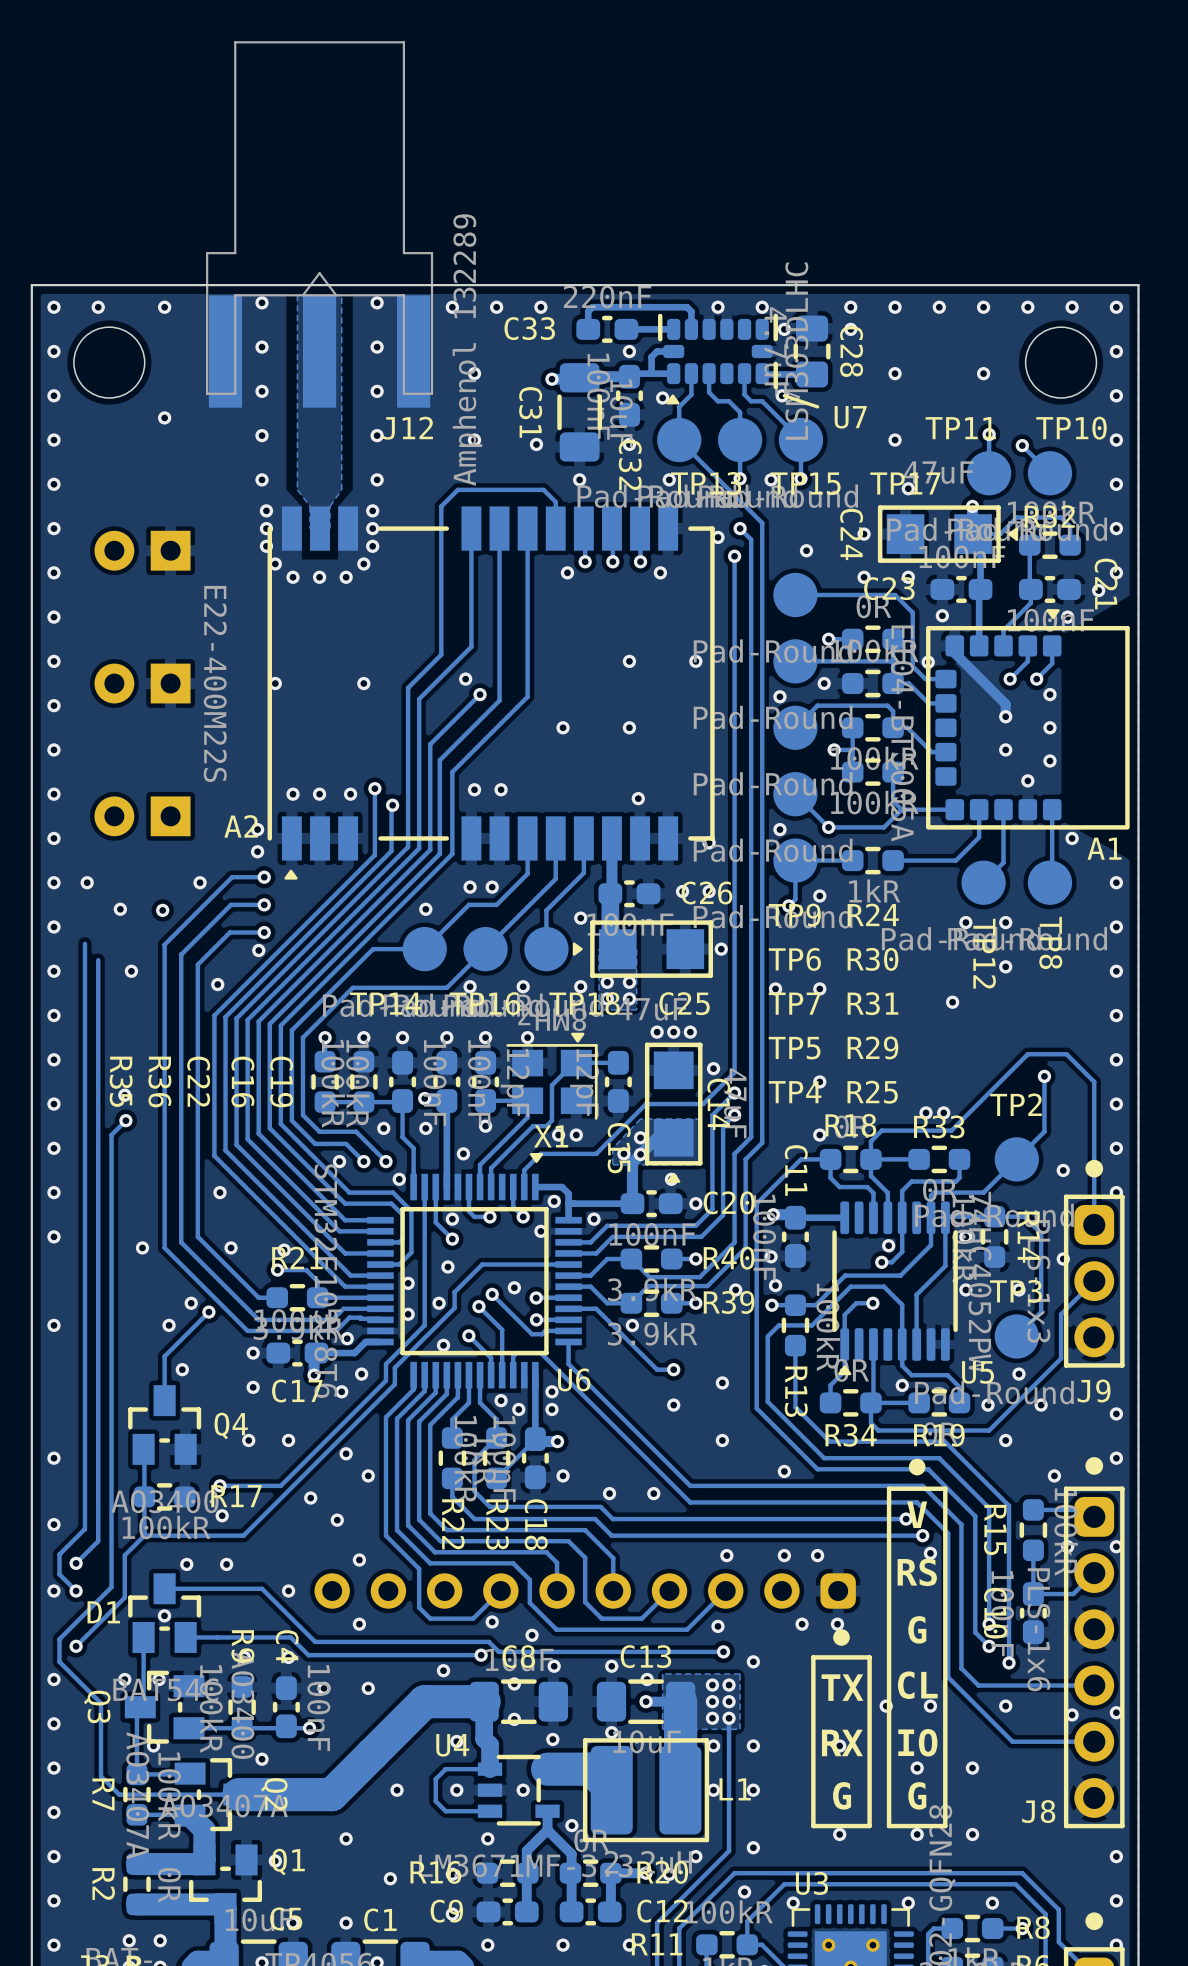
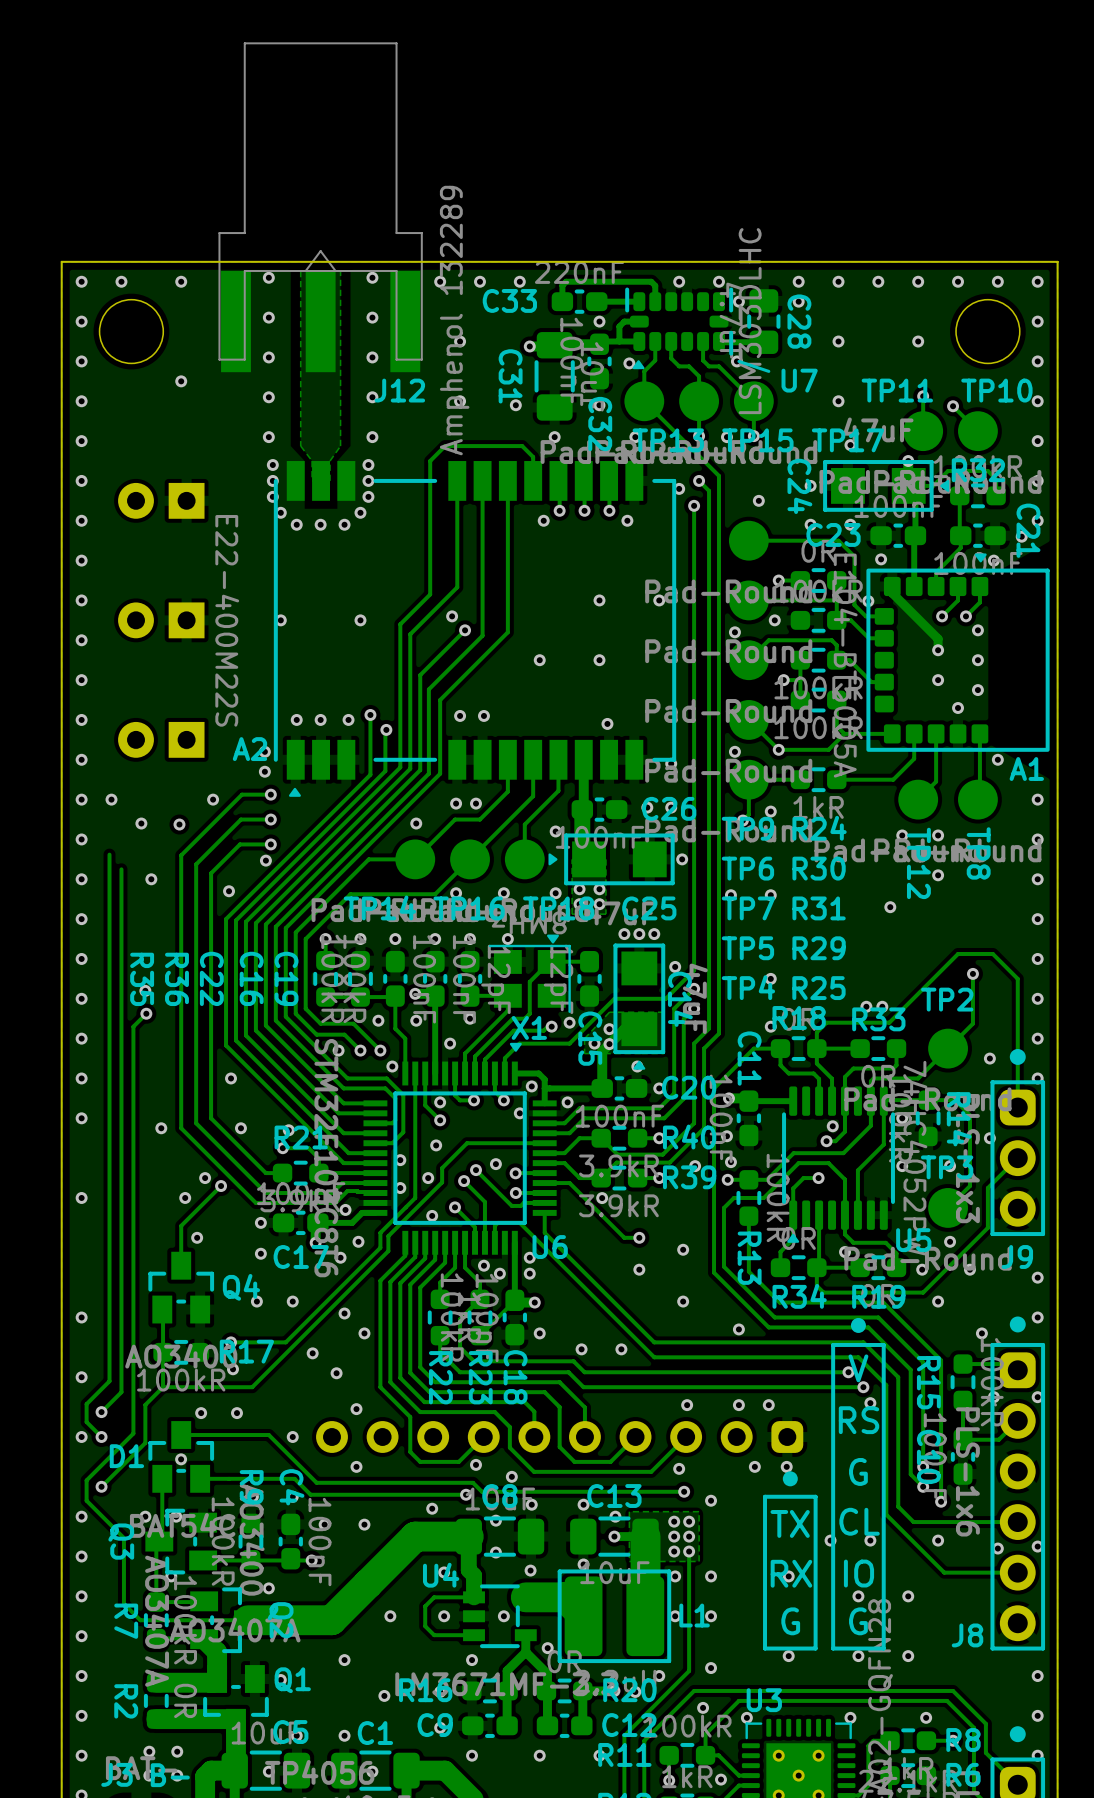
track: none -> (551, 1022) (543, 1030) (513, 1030) (484, 1059) (484, 1073)
via position: (558, 1135) -> (569, 1022)

